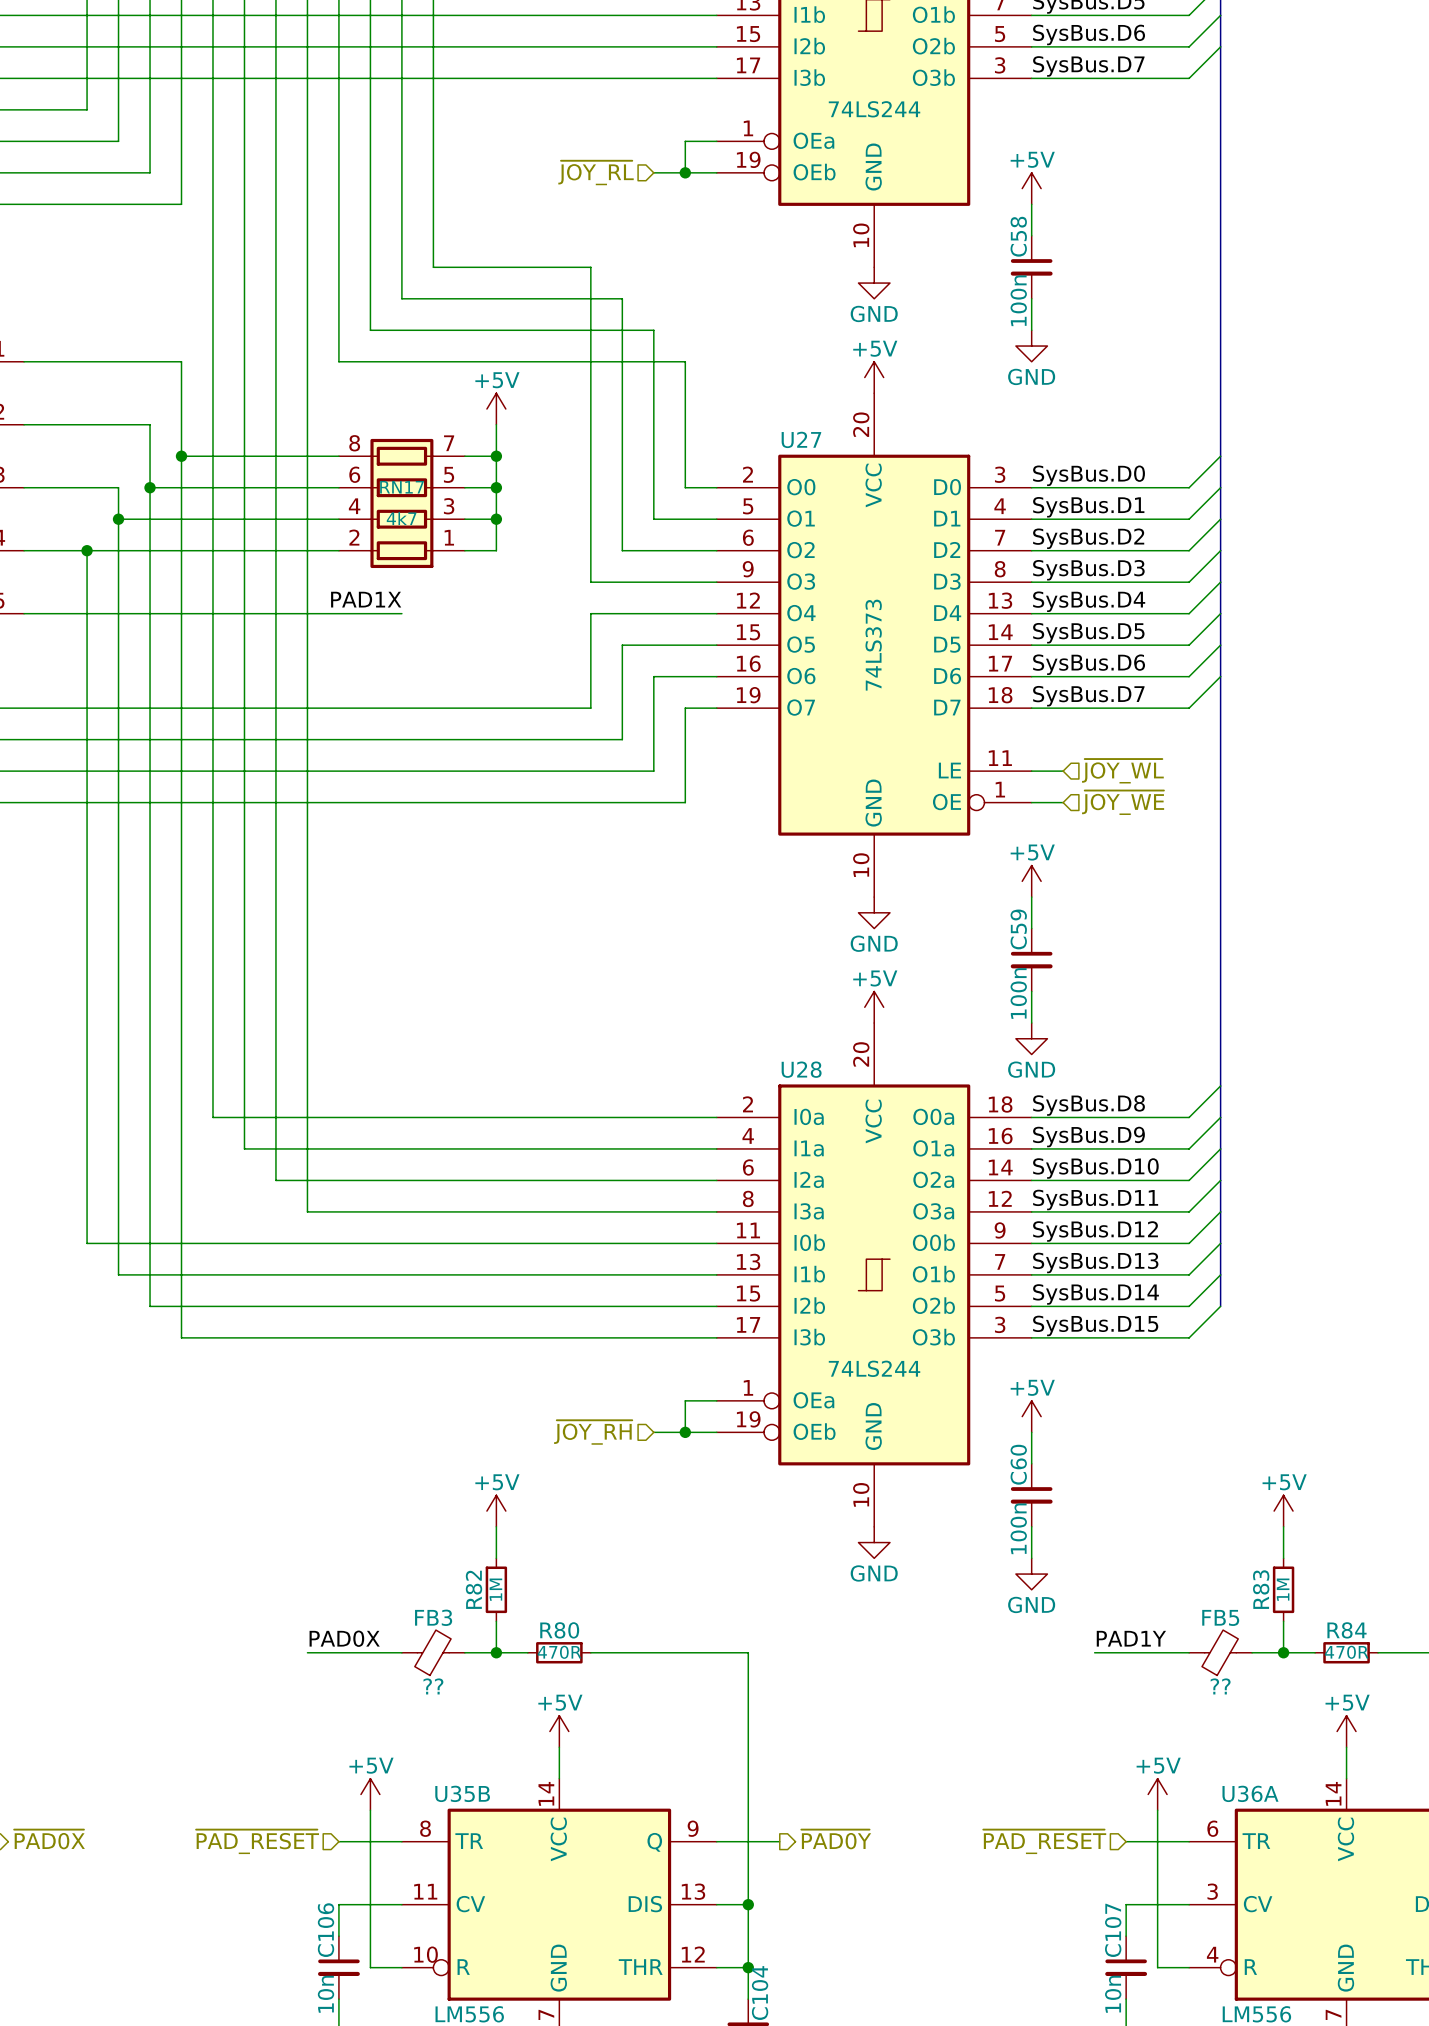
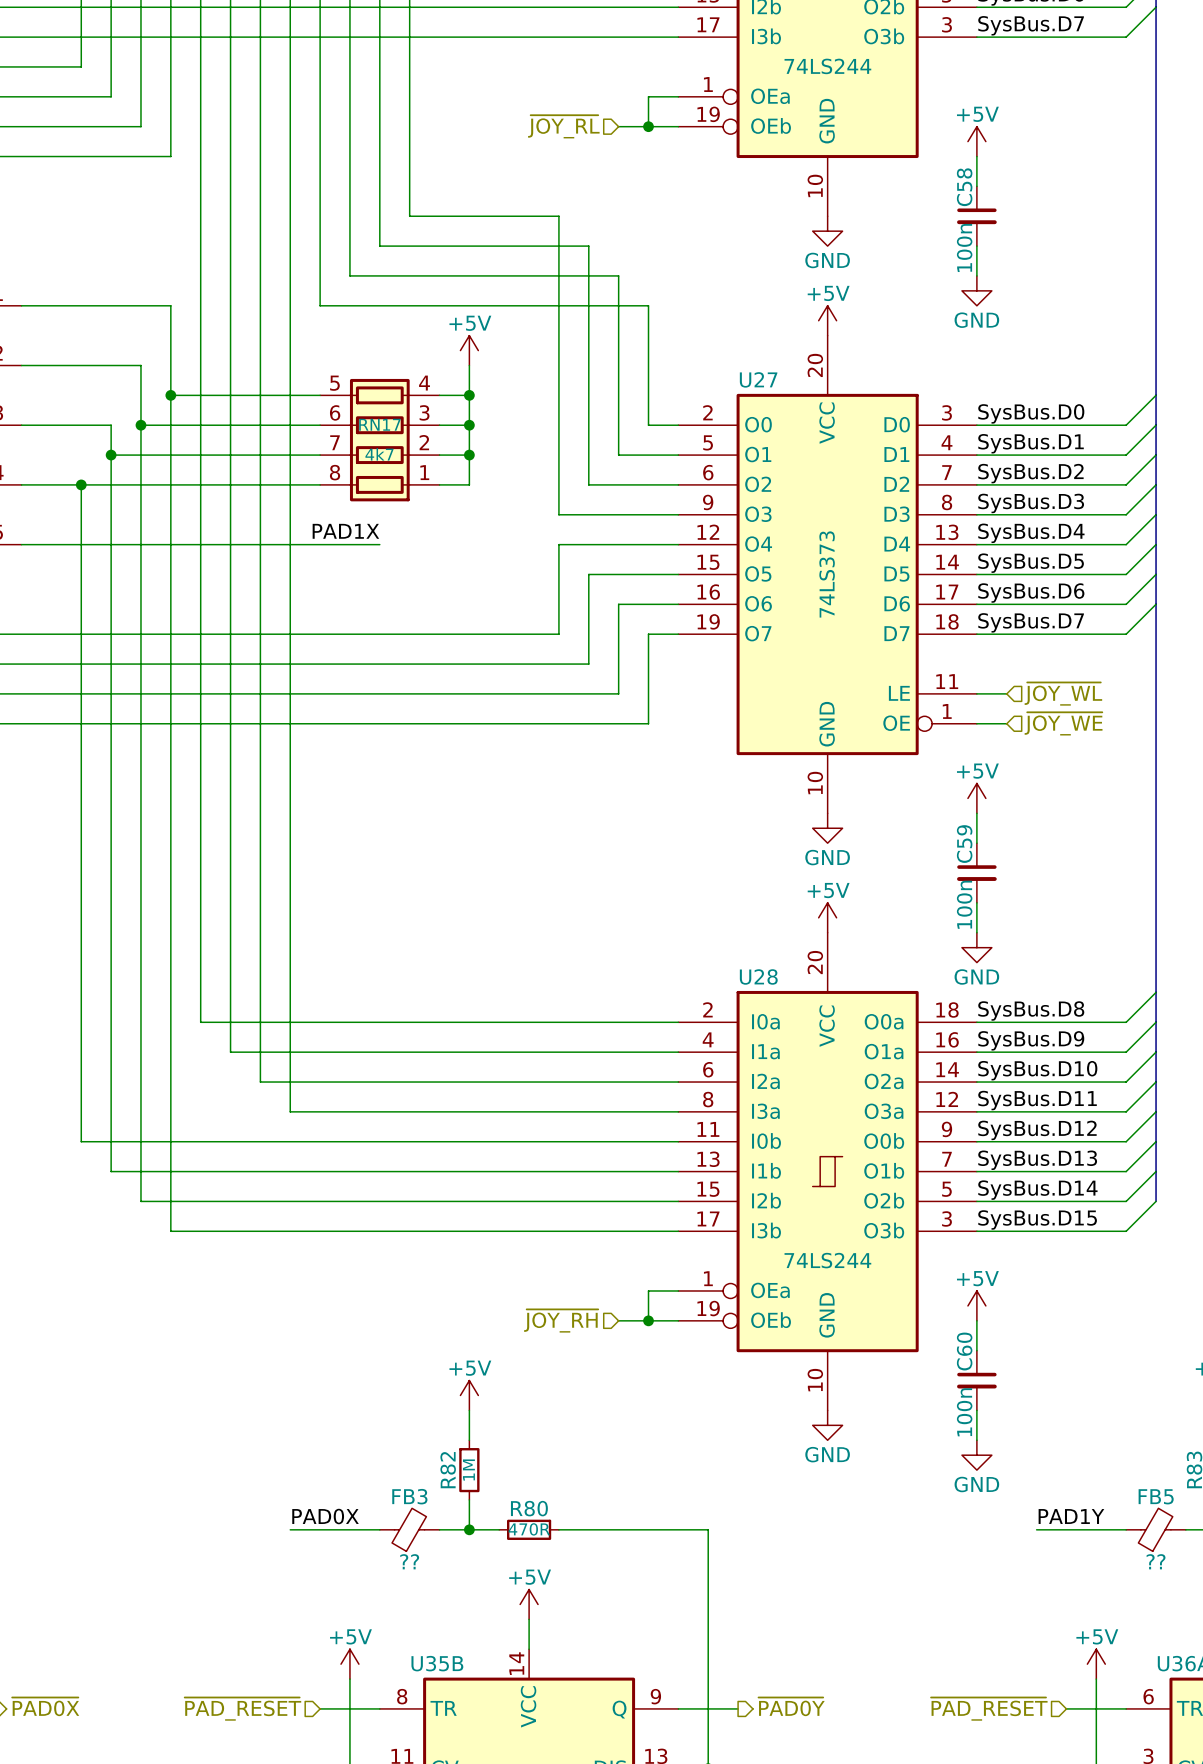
RN17 pin number: 8 (354, 443) -> 5 (334, 383)
RN17 pin number: 7 (449, 443) -> 4 (424, 383)
RN17 pin number: 5 (449, 474) -> 3 (424, 412)
RN17 pin number: 4 (354, 506) -> 7 (335, 442)
RN17 pin number: 3 (449, 506) -> 2 (424, 442)
RN17 pin number: 2 (354, 537) -> 8 (335, 472)

